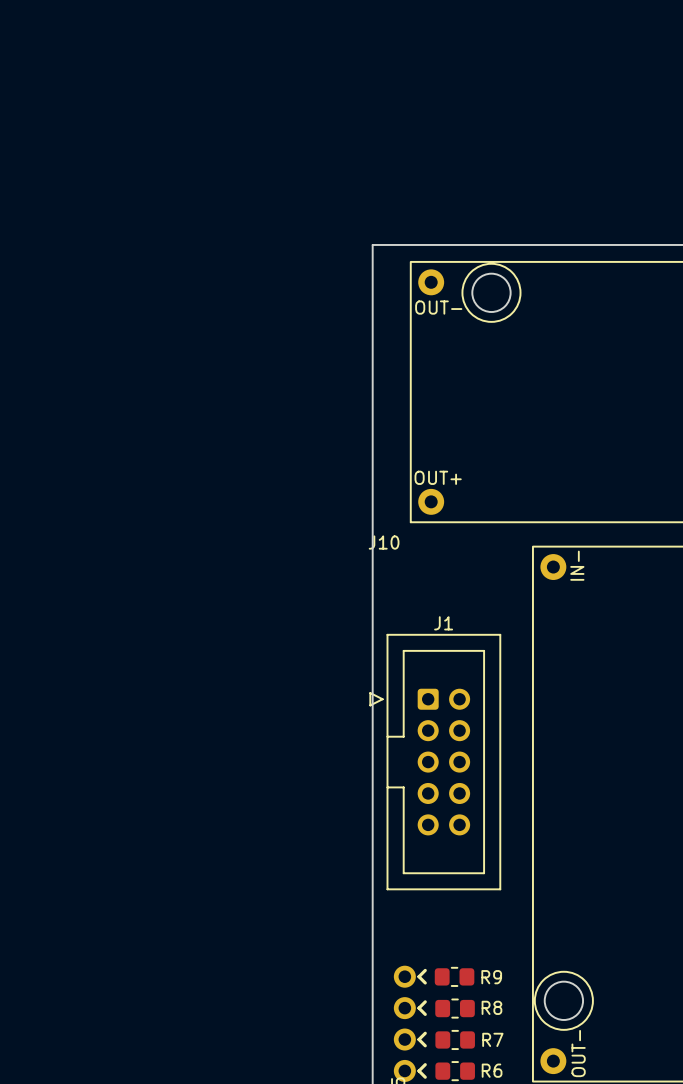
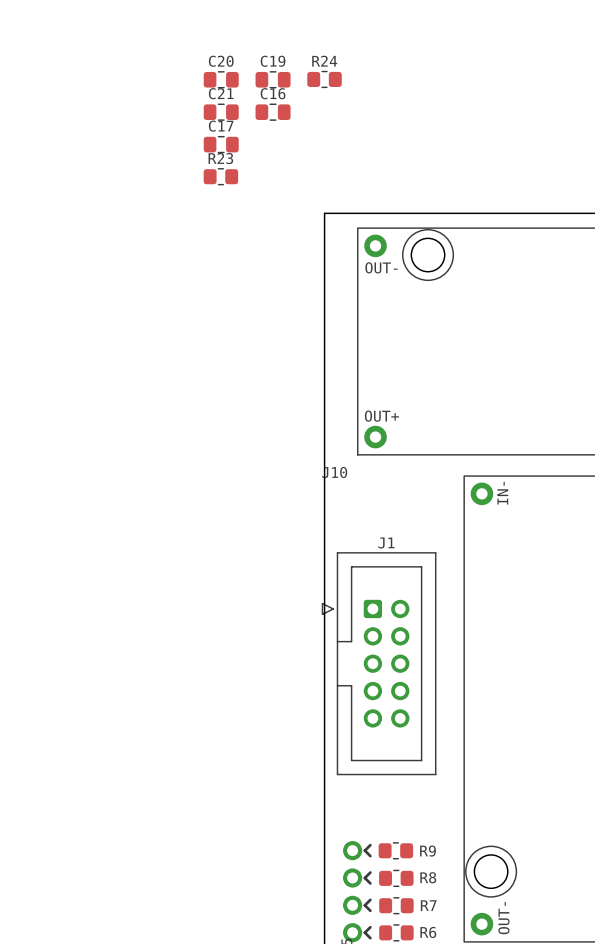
C20: none -> (221, 79)
C19: none -> (273, 79)
R24: none -> (324, 79)
C21: none -> (221, 112)
C16: none -> (273, 112)
C17: none -> (221, 144)
R23: none -> (220, 176)

